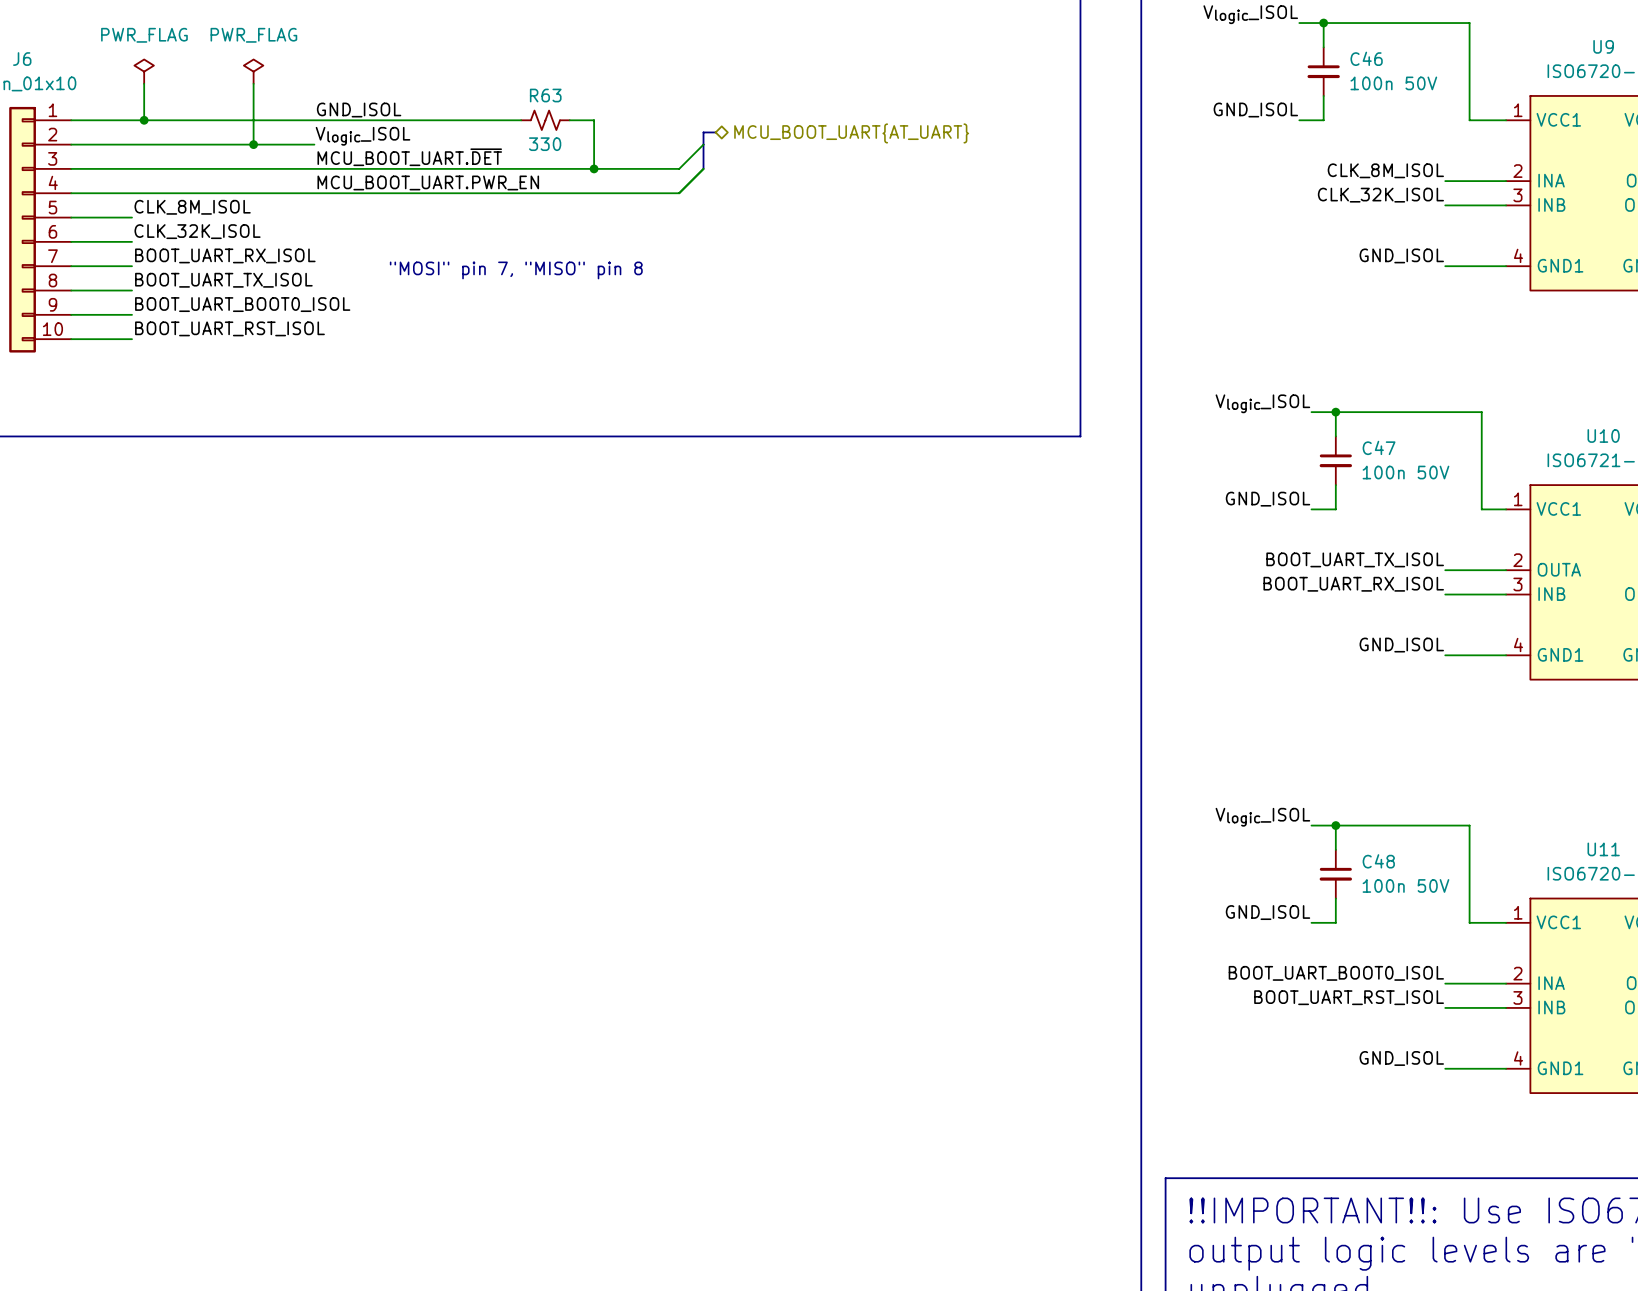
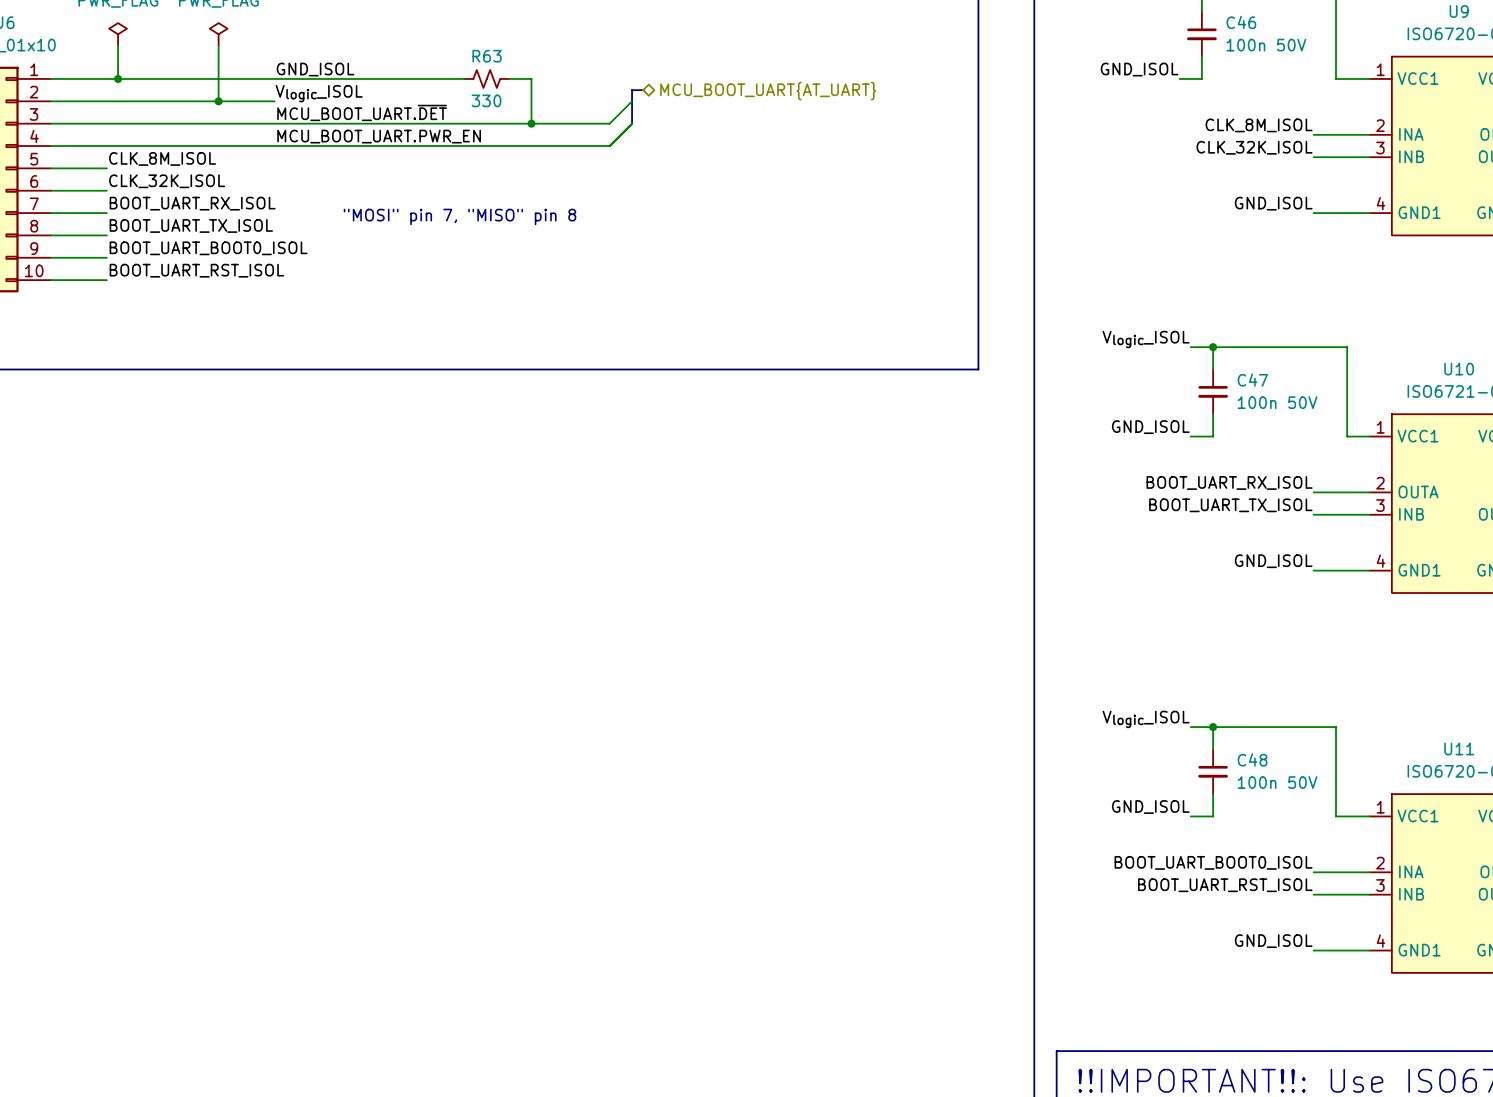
label: BOOT_UART_TX_ISOL (1355, 559) -> BOOT_UART_RX_ISOL (1229, 482)
label: BOOT_UART_RX_ISOL (1353, 584) -> BOOT_UART_TX_ISOL (1230, 505)

